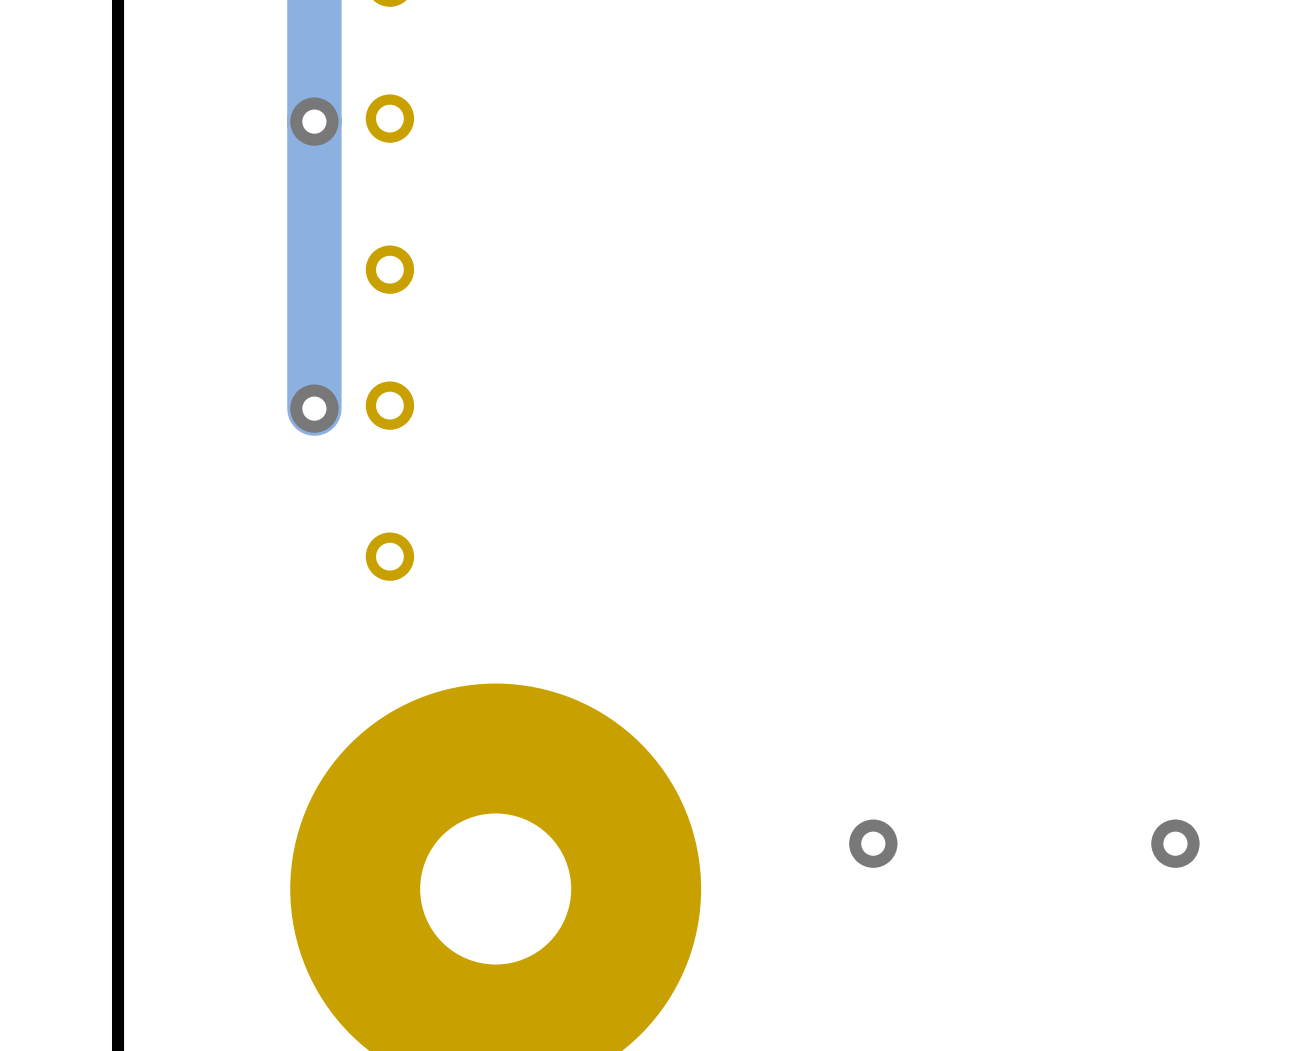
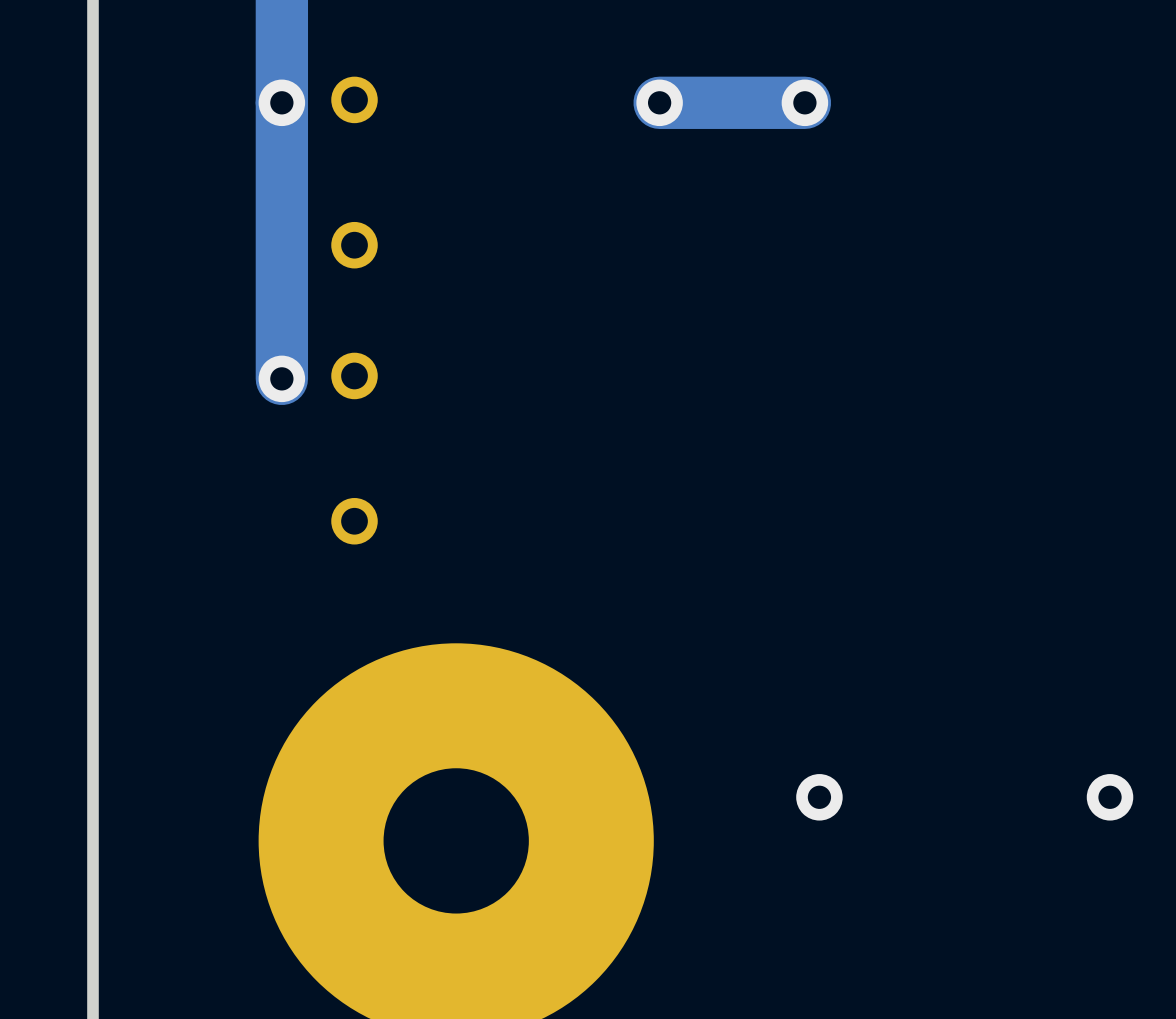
via: none -> (659, 102)
track: none -> (804, 102) (659, 102)
via: none -> (804, 102)

